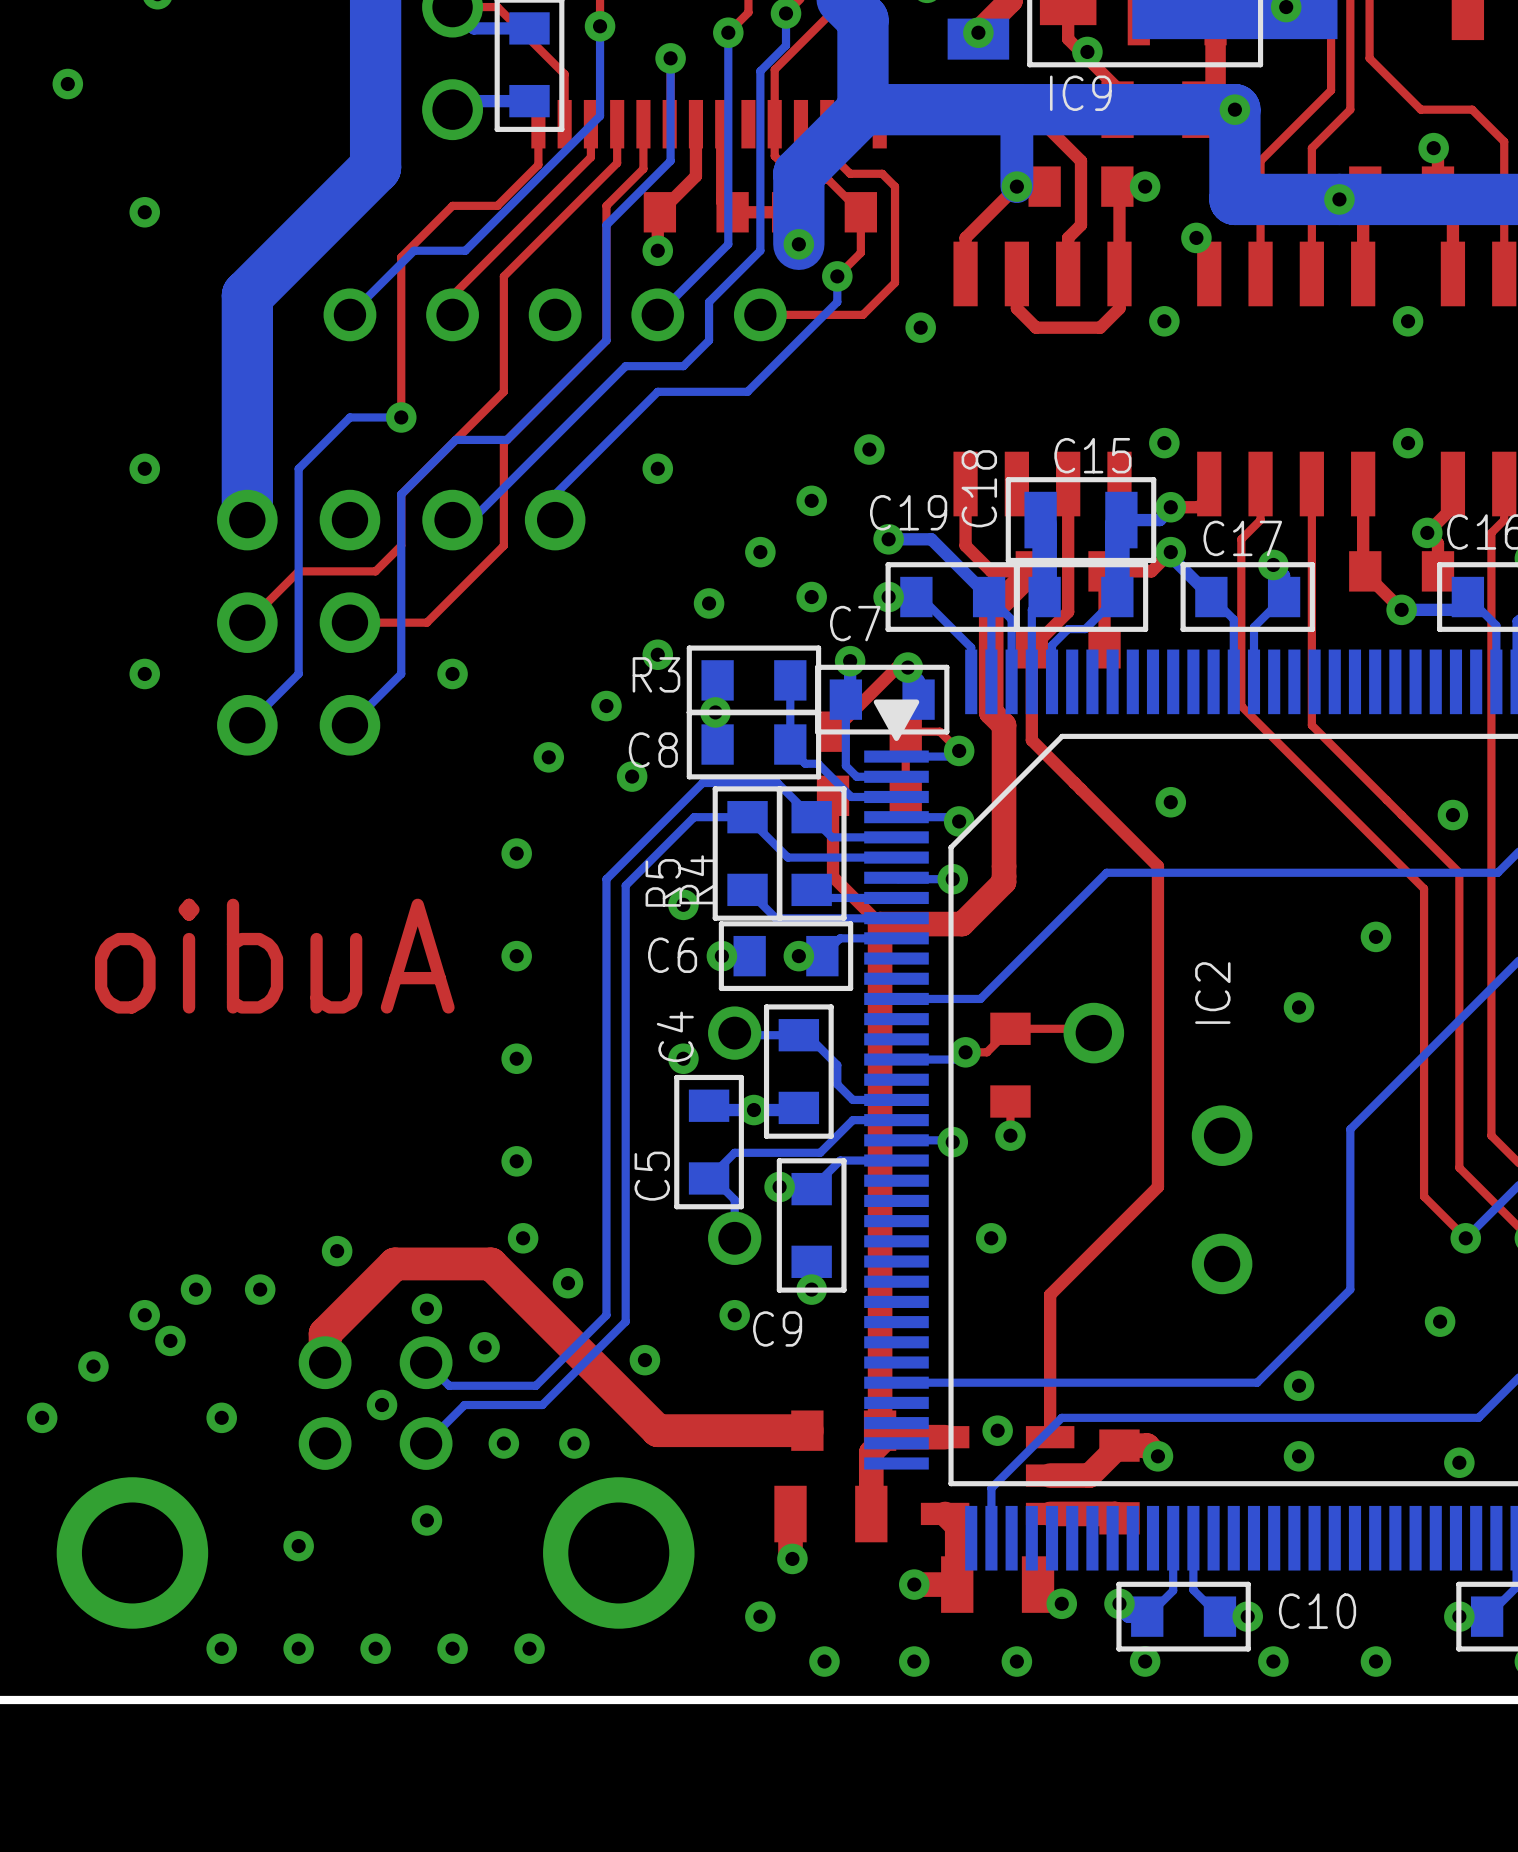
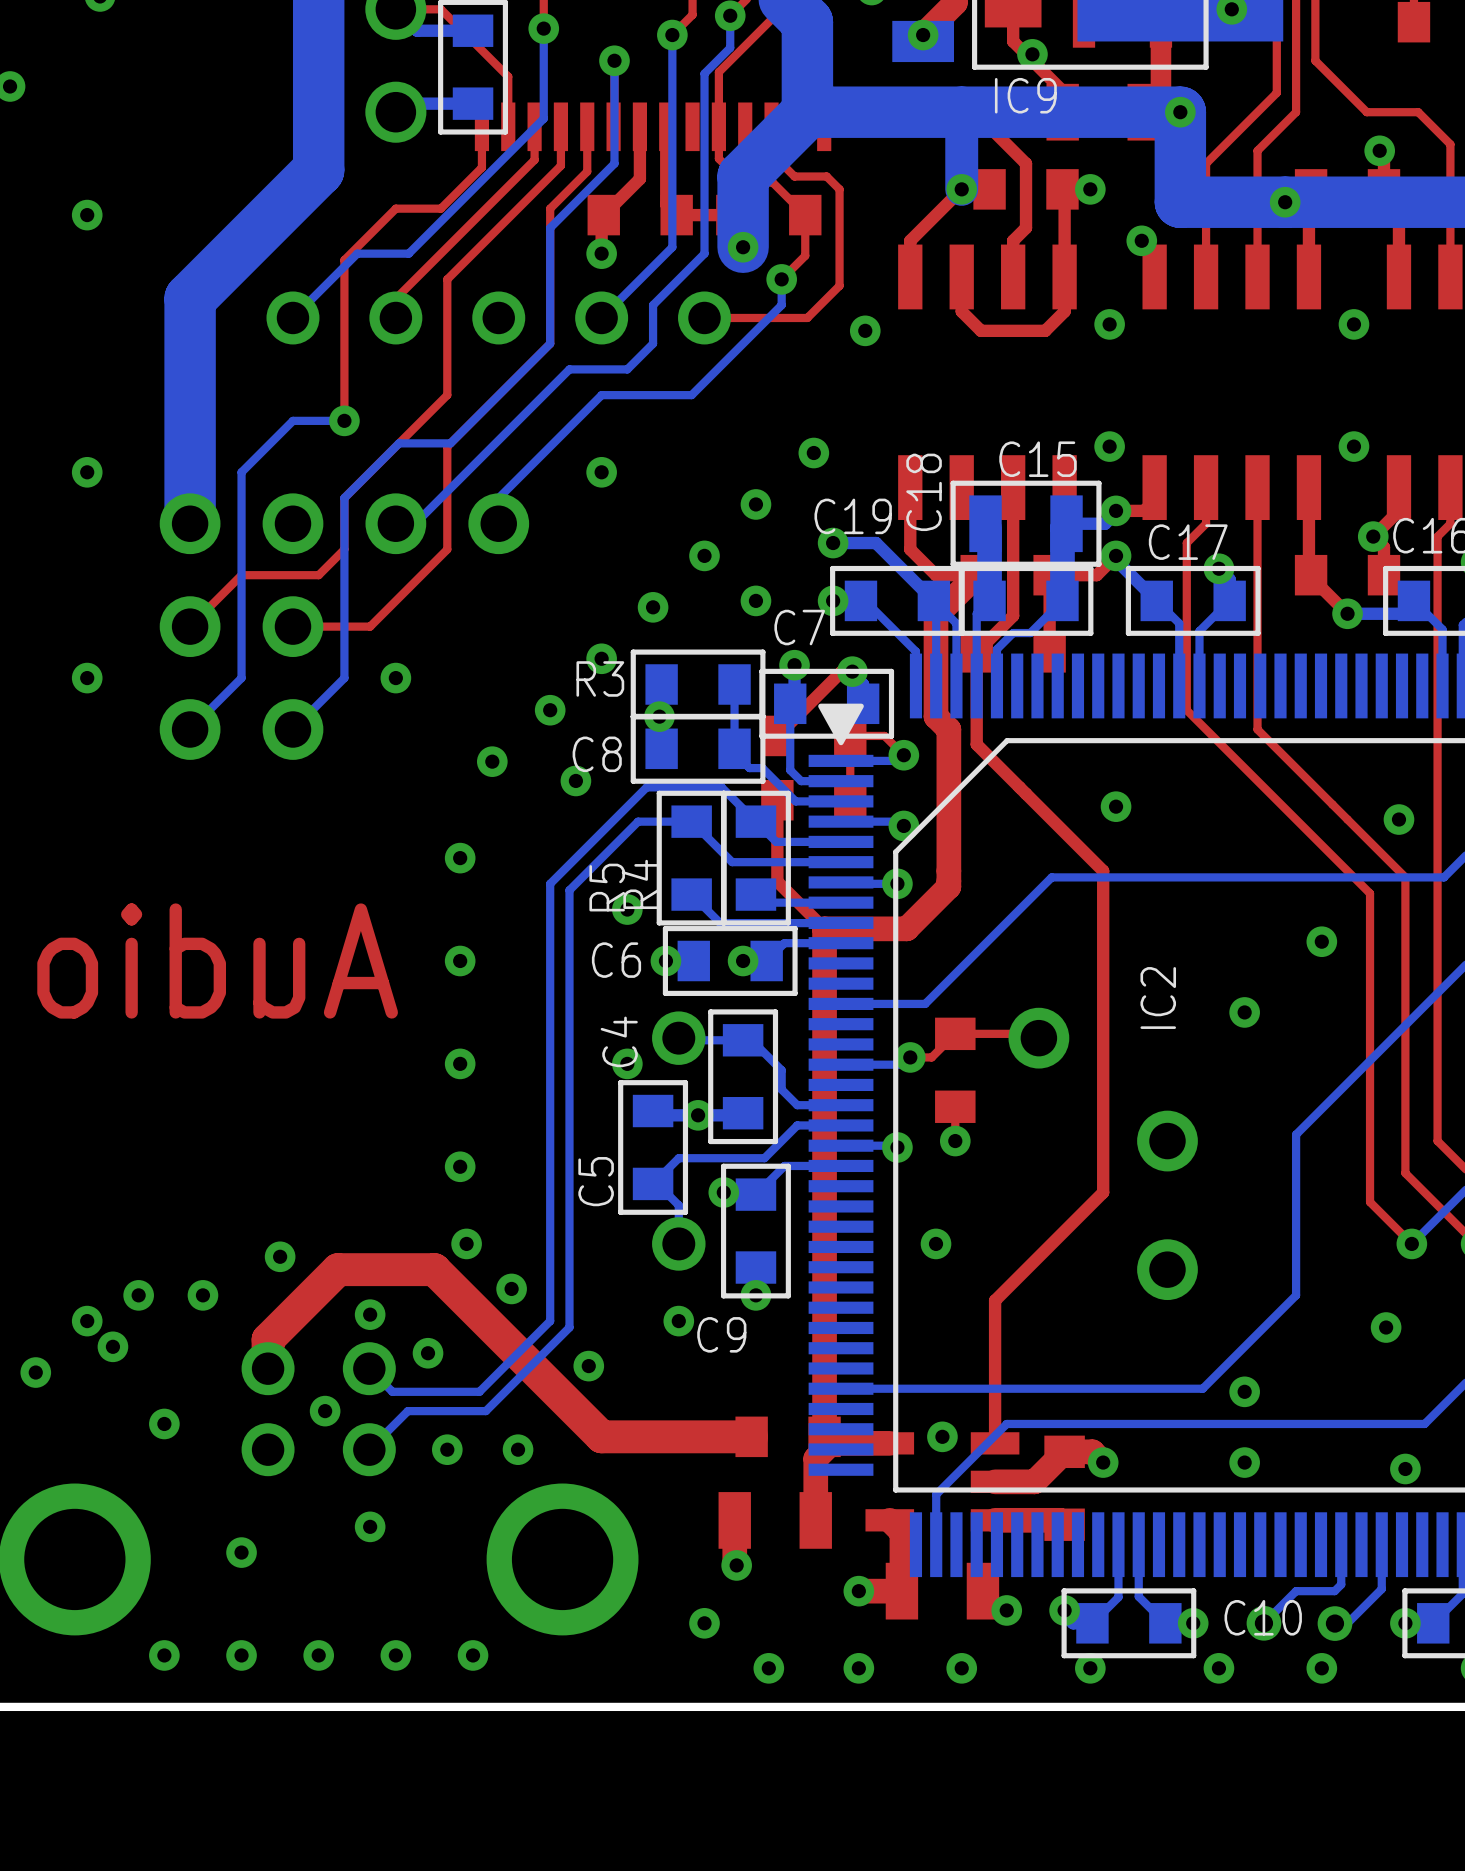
bottom track: none -> (1341, 1544) (1341, 1584) (1334, 1591) (1296, 1591) (1263, 1623)
bottom track: none -> (1381, 1544) (1381, 1589) (1347, 1623) (1334, 1623)
via: none -> (1263, 1623)
via: none -> (1334, 1623)

